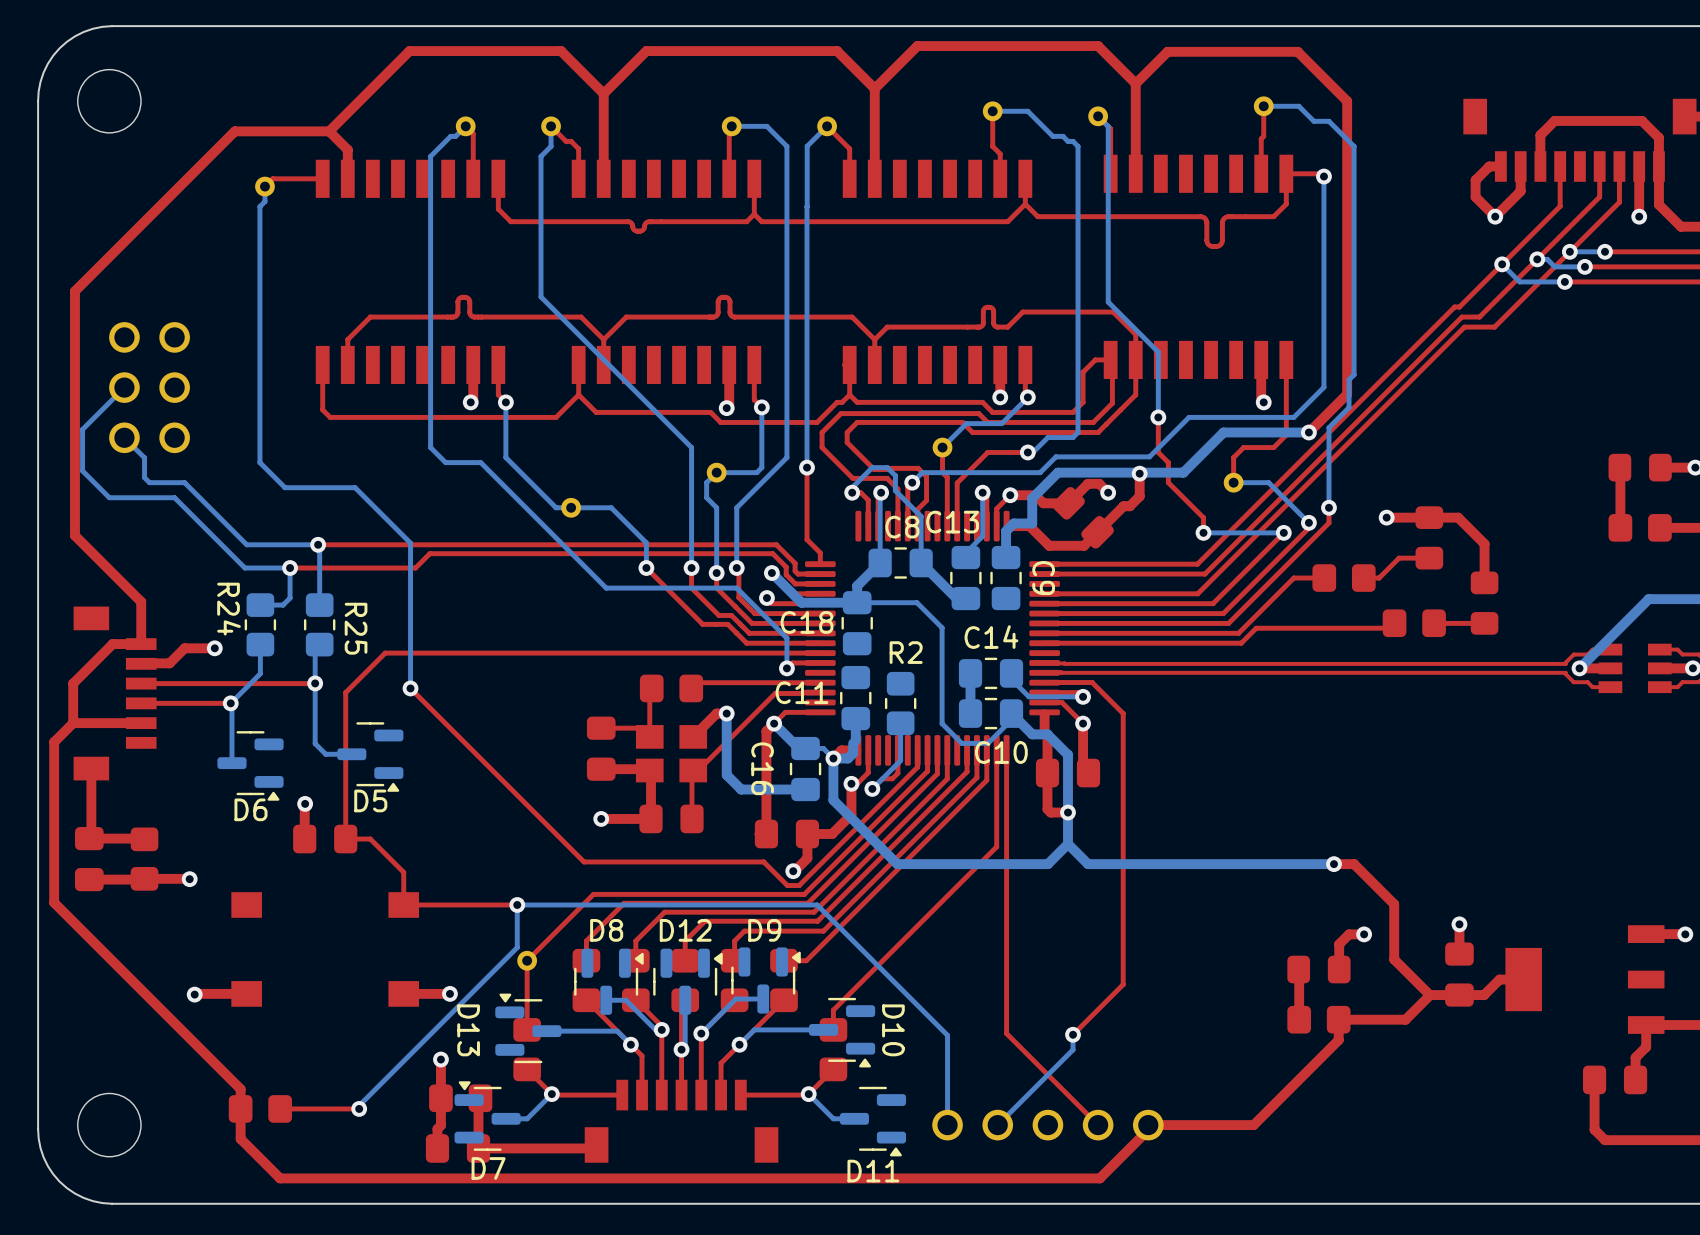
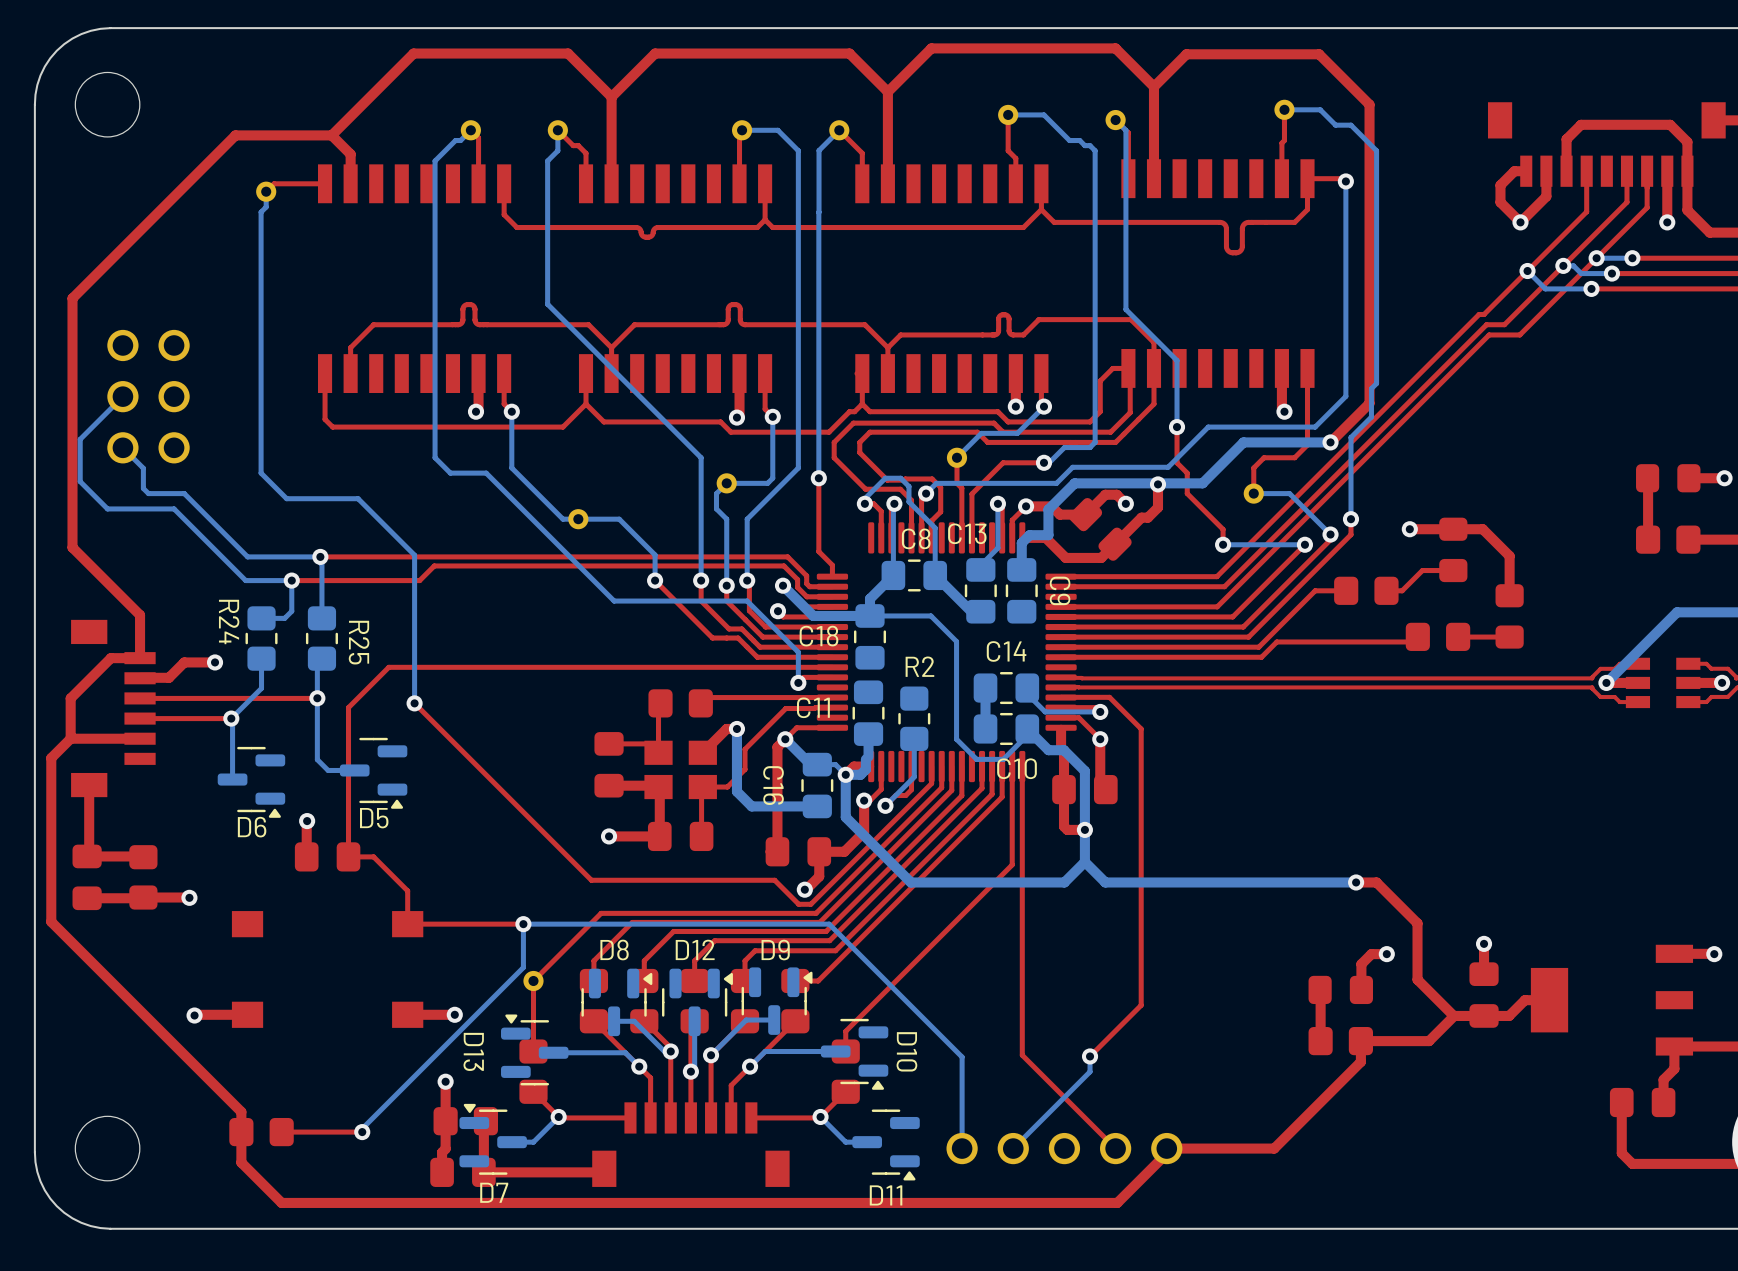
top track: (775, 693) (698, 770) -> (786, 708) (745, 749) (745, 769) (727, 787) (707, 787)

